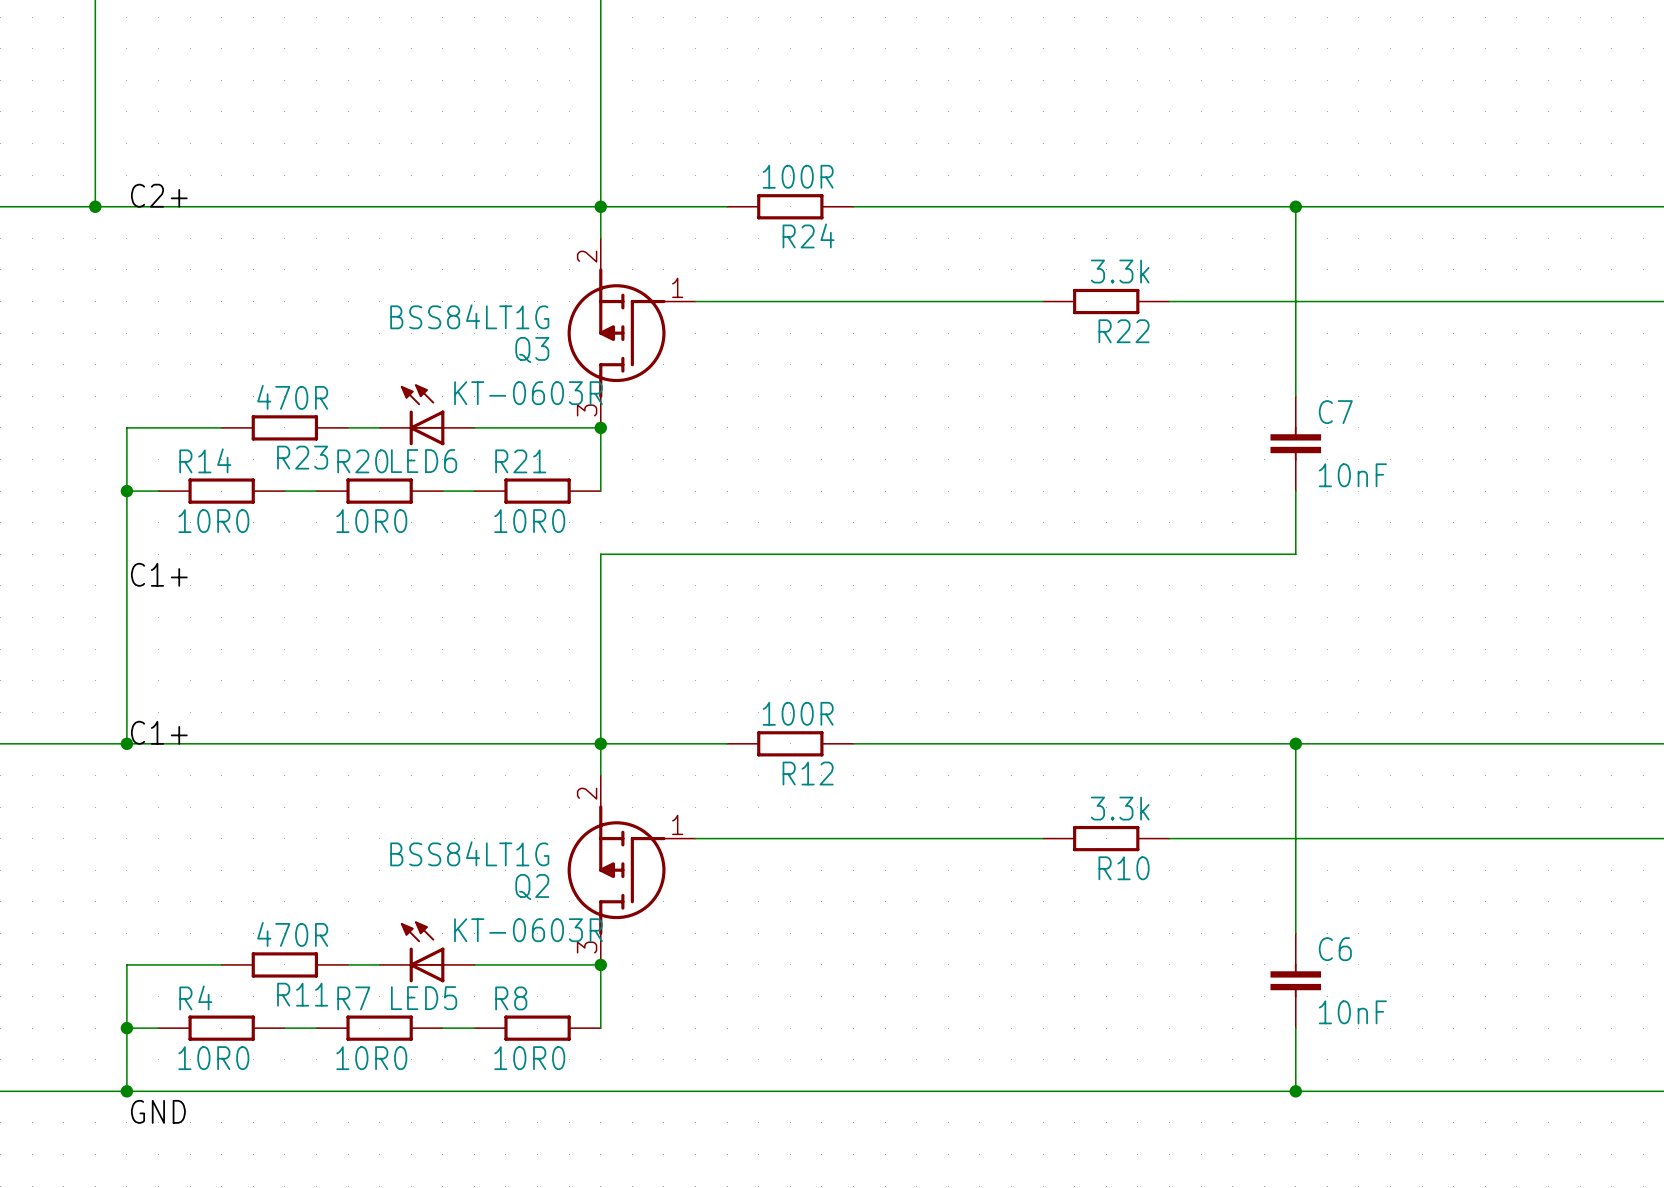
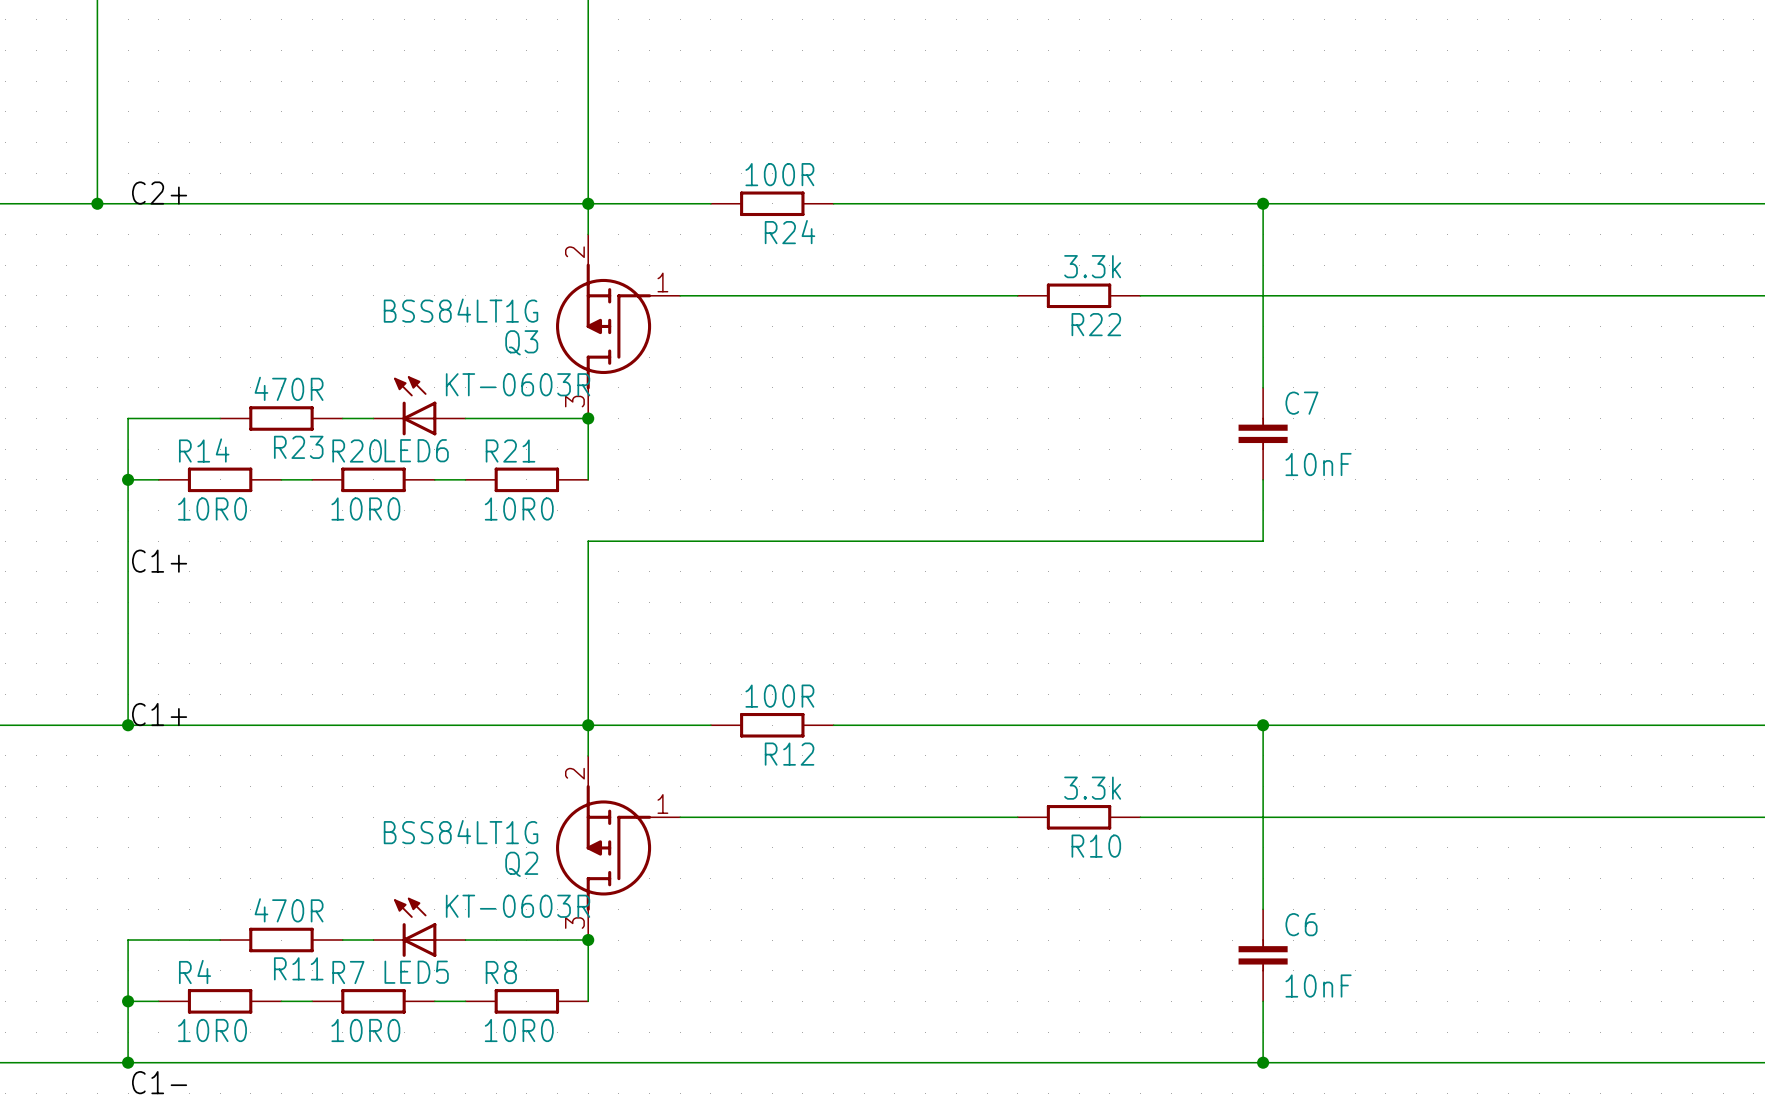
label: GND (158, 1111) -> C1- (159, 1082)

